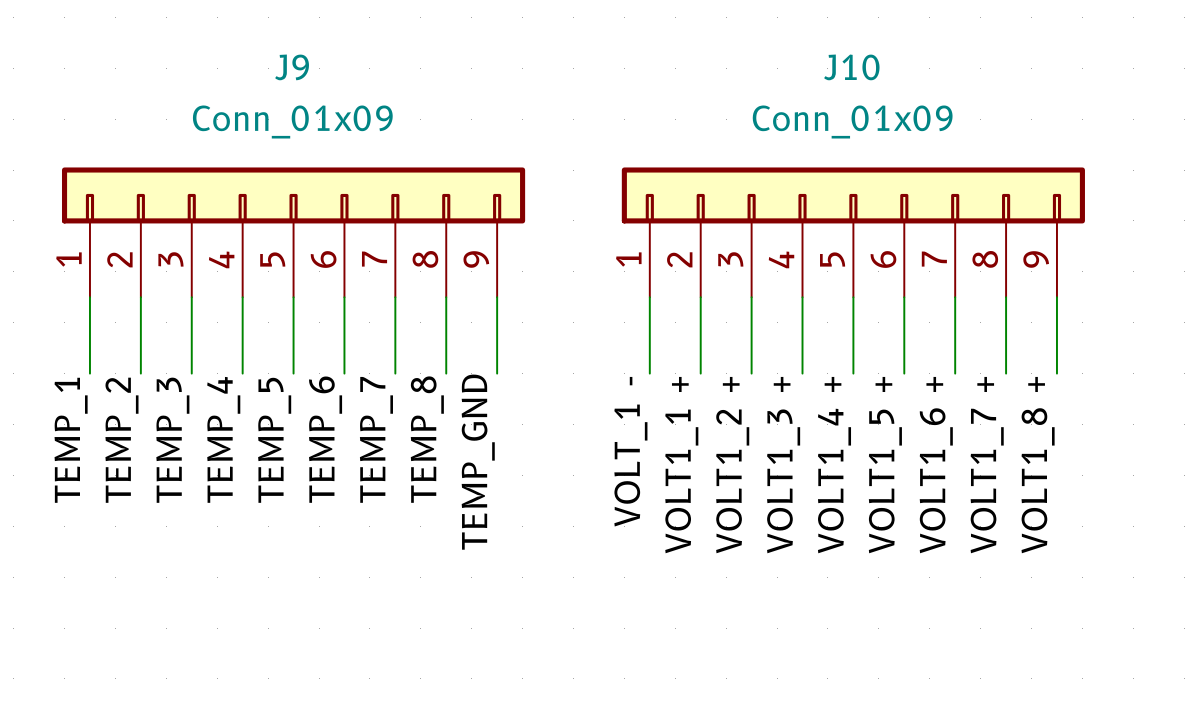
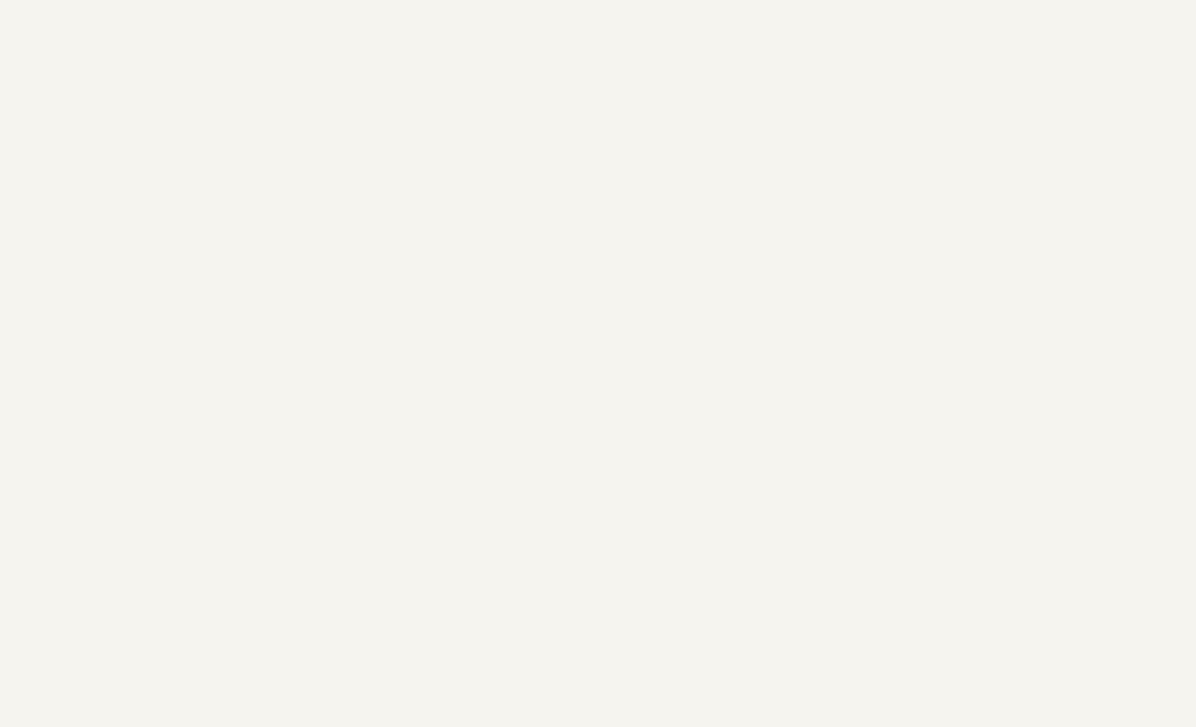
J9: Conn_01x09 (293, 232) -> none
J10: Conn_01x09 (853, 232) -> none
wire: (89, 297) (89, 373) -> none
wire: (140, 297) (140, 373) -> none
wire: (191, 297) (191, 373) -> none
wire: (242, 297) (242, 373) -> none
wire: (293, 297) (293, 373) -> none
wire: (344, 297) (344, 373) -> none
wire: (395, 297) (395, 373) -> none
wire: (446, 297) (446, 373) -> none
wire: (497, 297) (497, 373) -> none
wire: (649, 297) (649, 373) -> none
wire: (700, 297) (700, 373) -> none
wire: (751, 297) (751, 373) -> none
wire: (802, 297) (802, 373) -> none
wire: (853, 297) (853, 373) -> none
wire: (904, 297) (904, 373) -> none
wire: (955, 297) (955, 373) -> none
wire: (1006, 297) (1006, 373) -> none
wire: (1056, 297) (1056, 373) -> none
label: TEMP_4 (223, 439) -> none
label: TEMP_6 (325, 439) -> none
label: TEMP_7 (376, 439) -> none
label: TEMP_8 (427, 439) -> none
label: TEMP_1 (71, 440) -> none
label: TEMP_2 (121, 440) -> none
label: TEMP_3 (172, 440) -> none
label: TEMP_5 (274, 440) -> none
label: VOLT_1 - (630, 451) -> none
label: TEMP_GND (478, 462) -> none
label: VOLT1_1 + (681, 465) -> none
label: VOLT1_2 + (732, 465) -> none
label: VOLT1_3 + (783, 465) -> none
label: VOLT1_4 + (834, 465) -> none
label: VOLT1_5 + (885, 465) -> none
label: VOLT1_6 + (936, 465) -> none
label: VOLT1_7 + (987, 465) -> none
label: VOLT1_8 + (1038, 465) -> none

